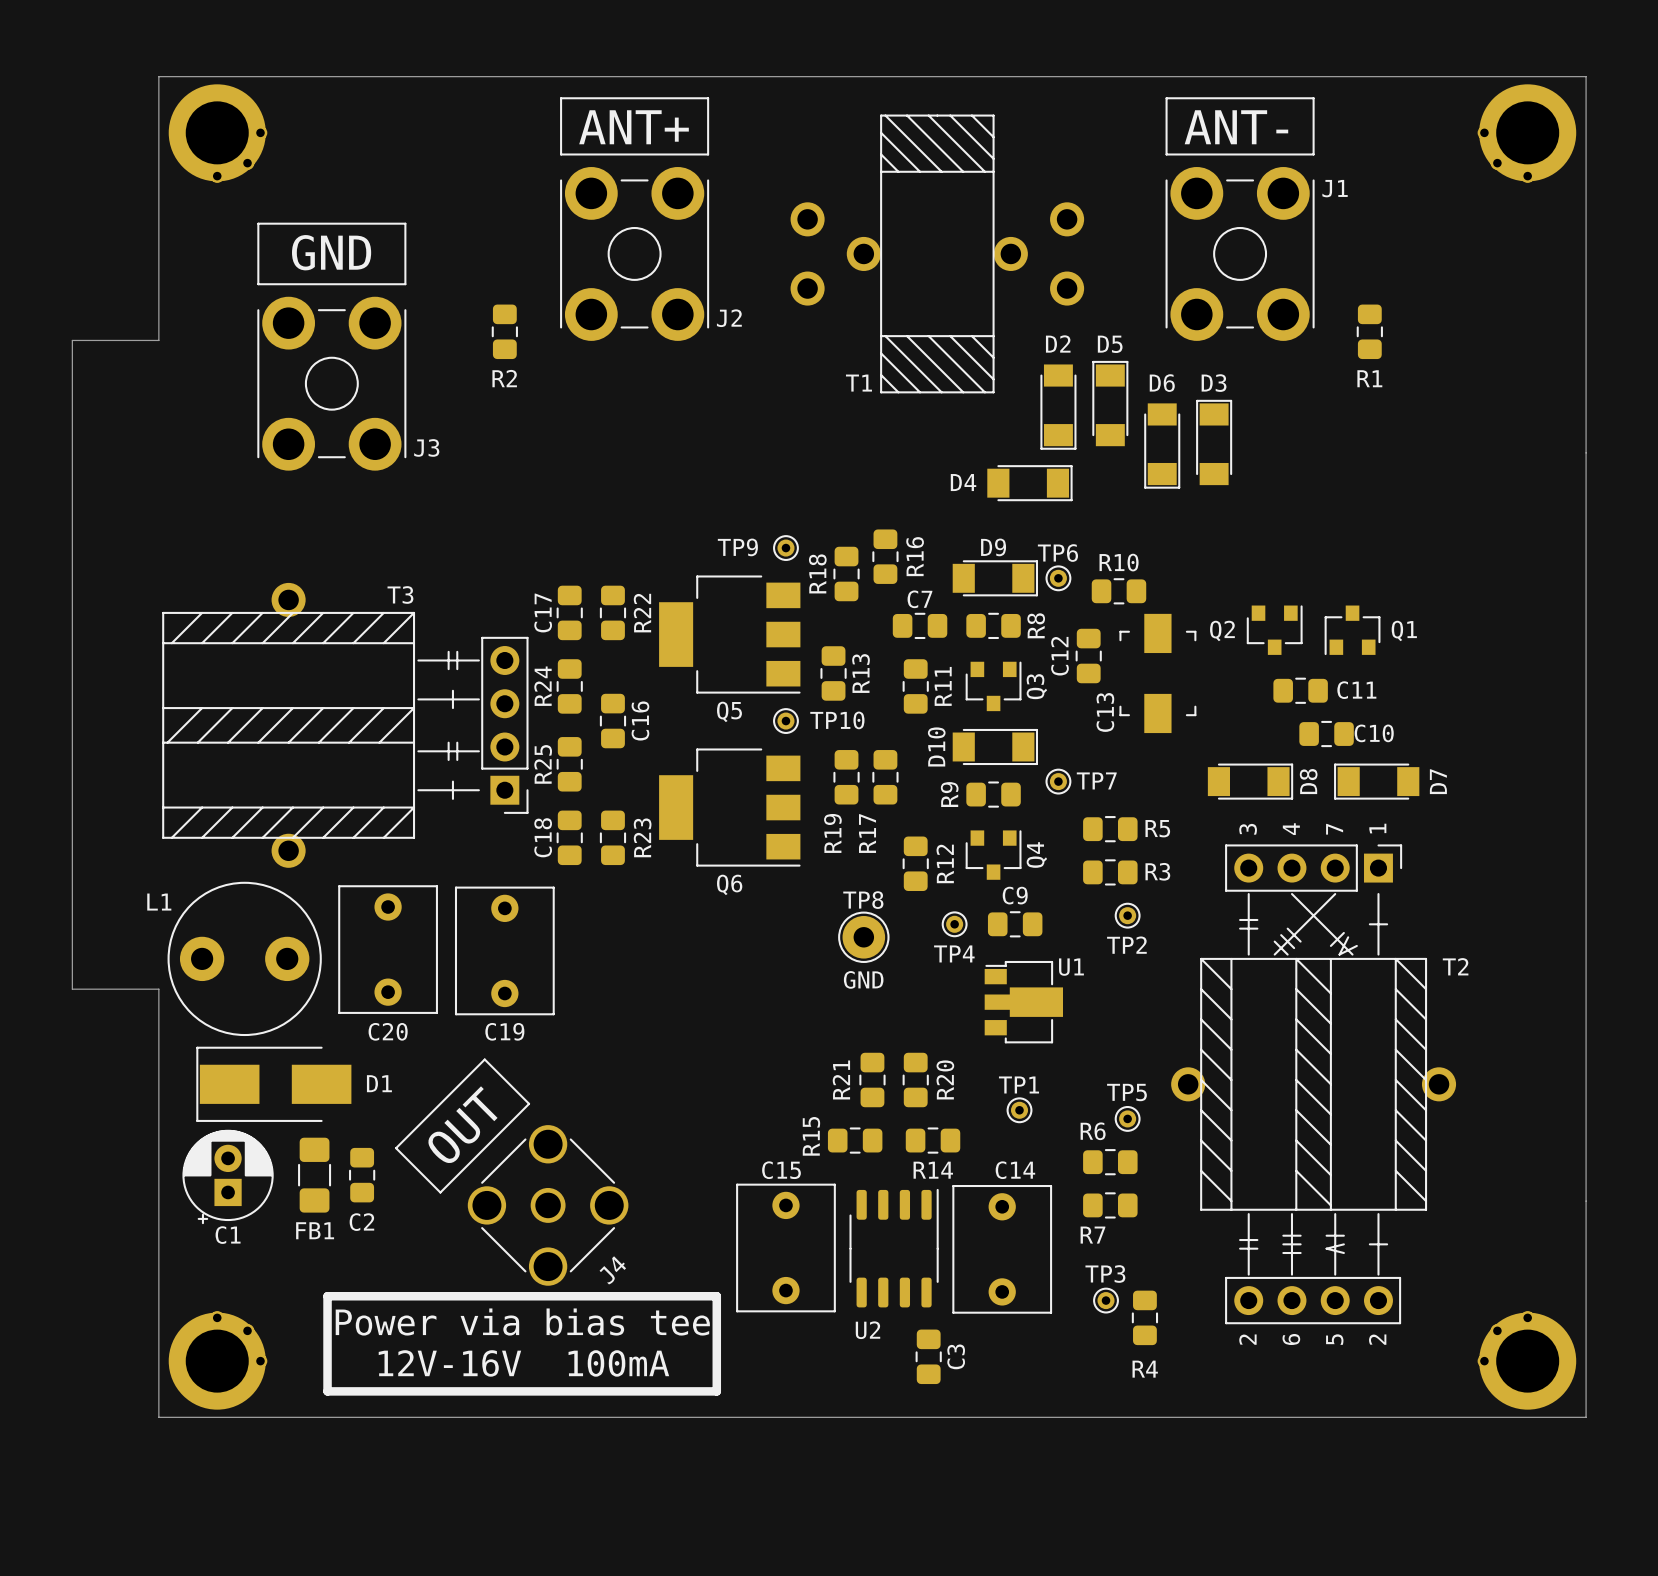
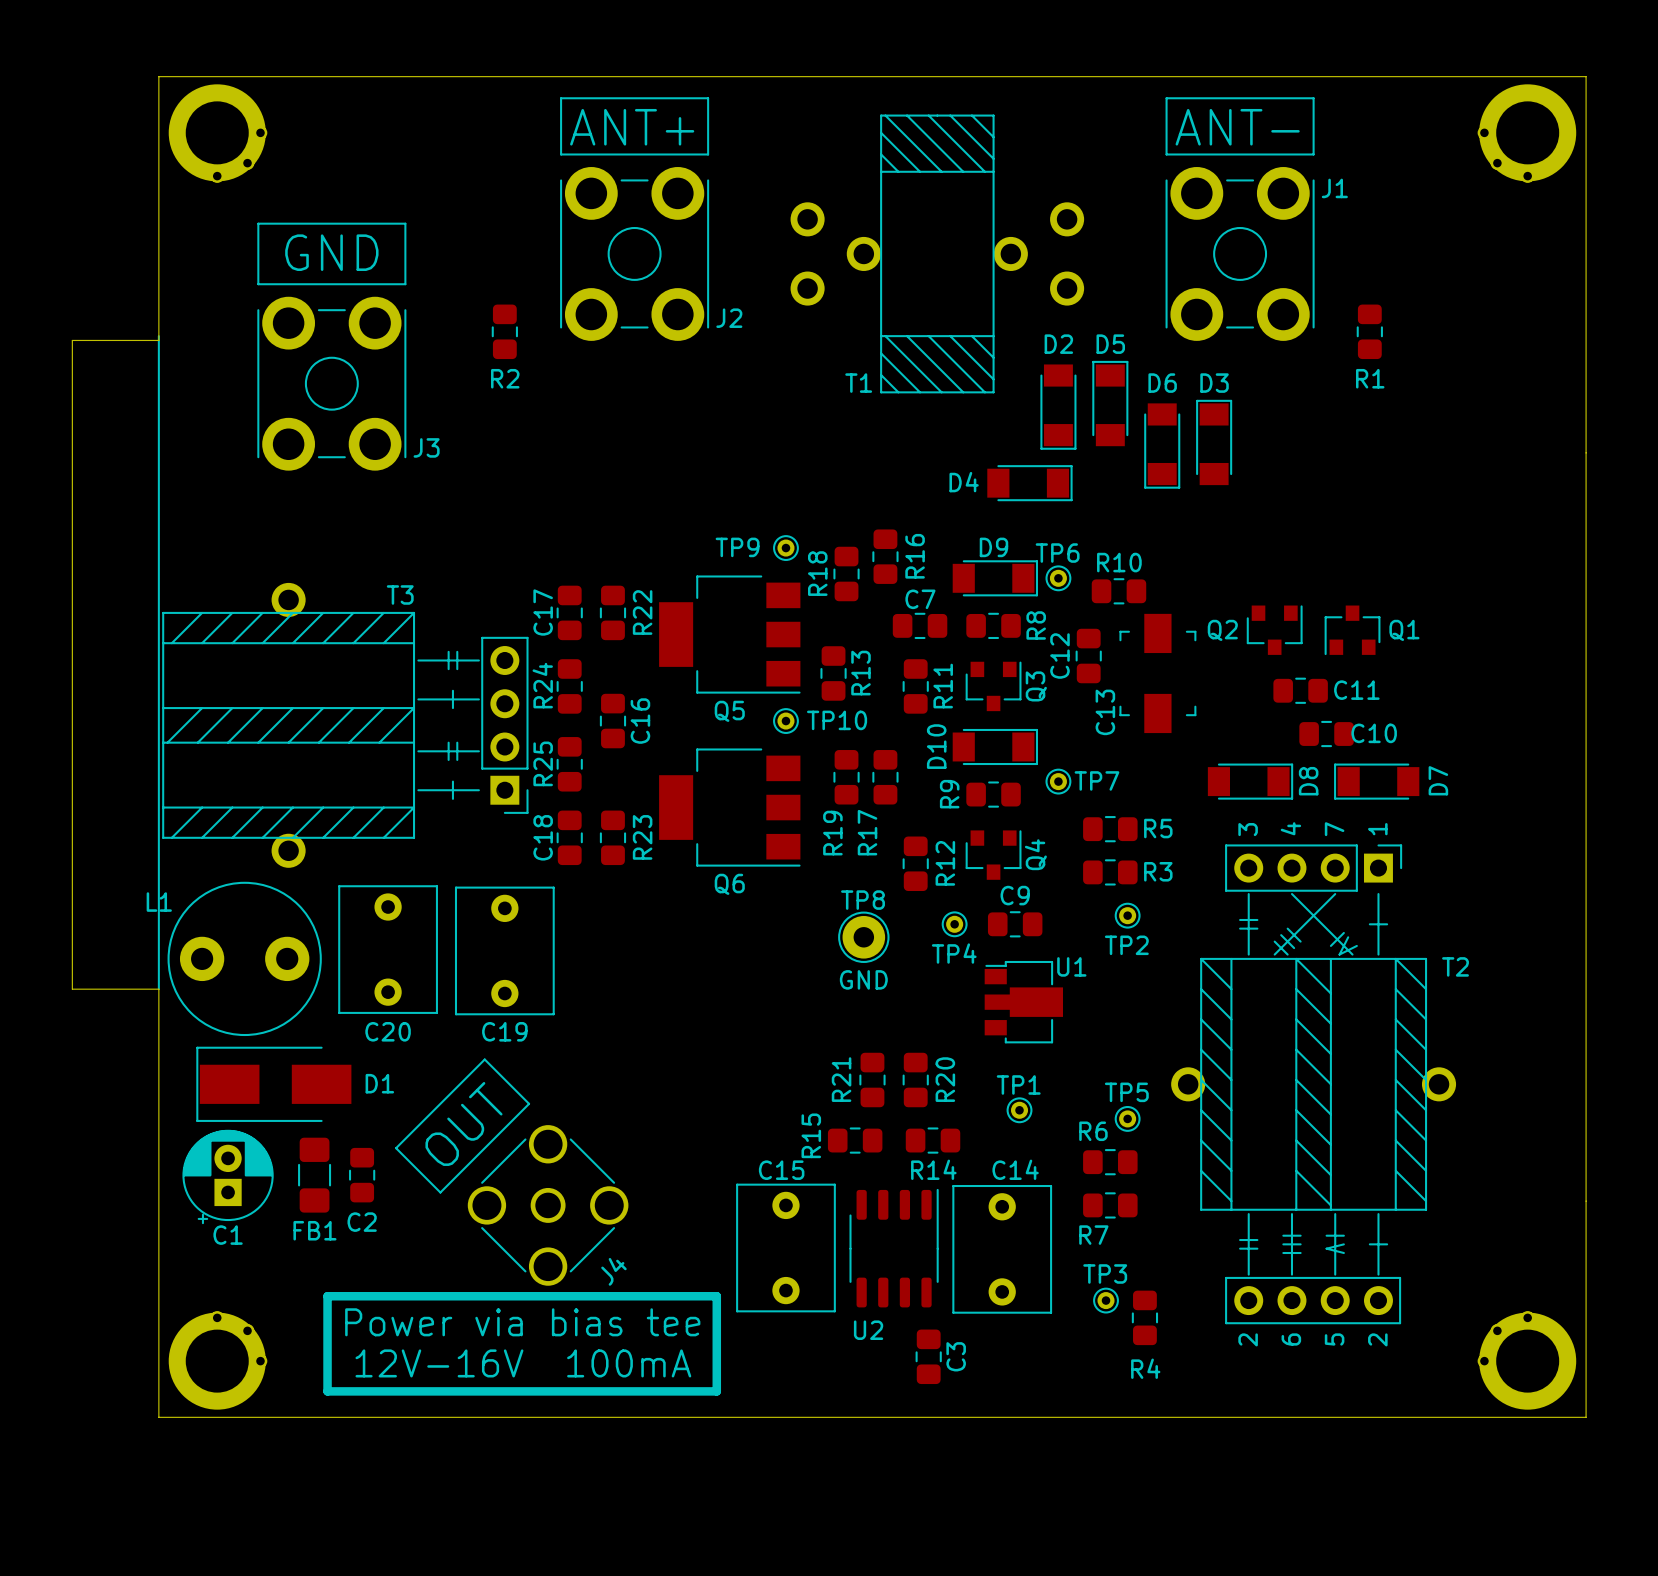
line: none -> (158, 336) (158, 989)

